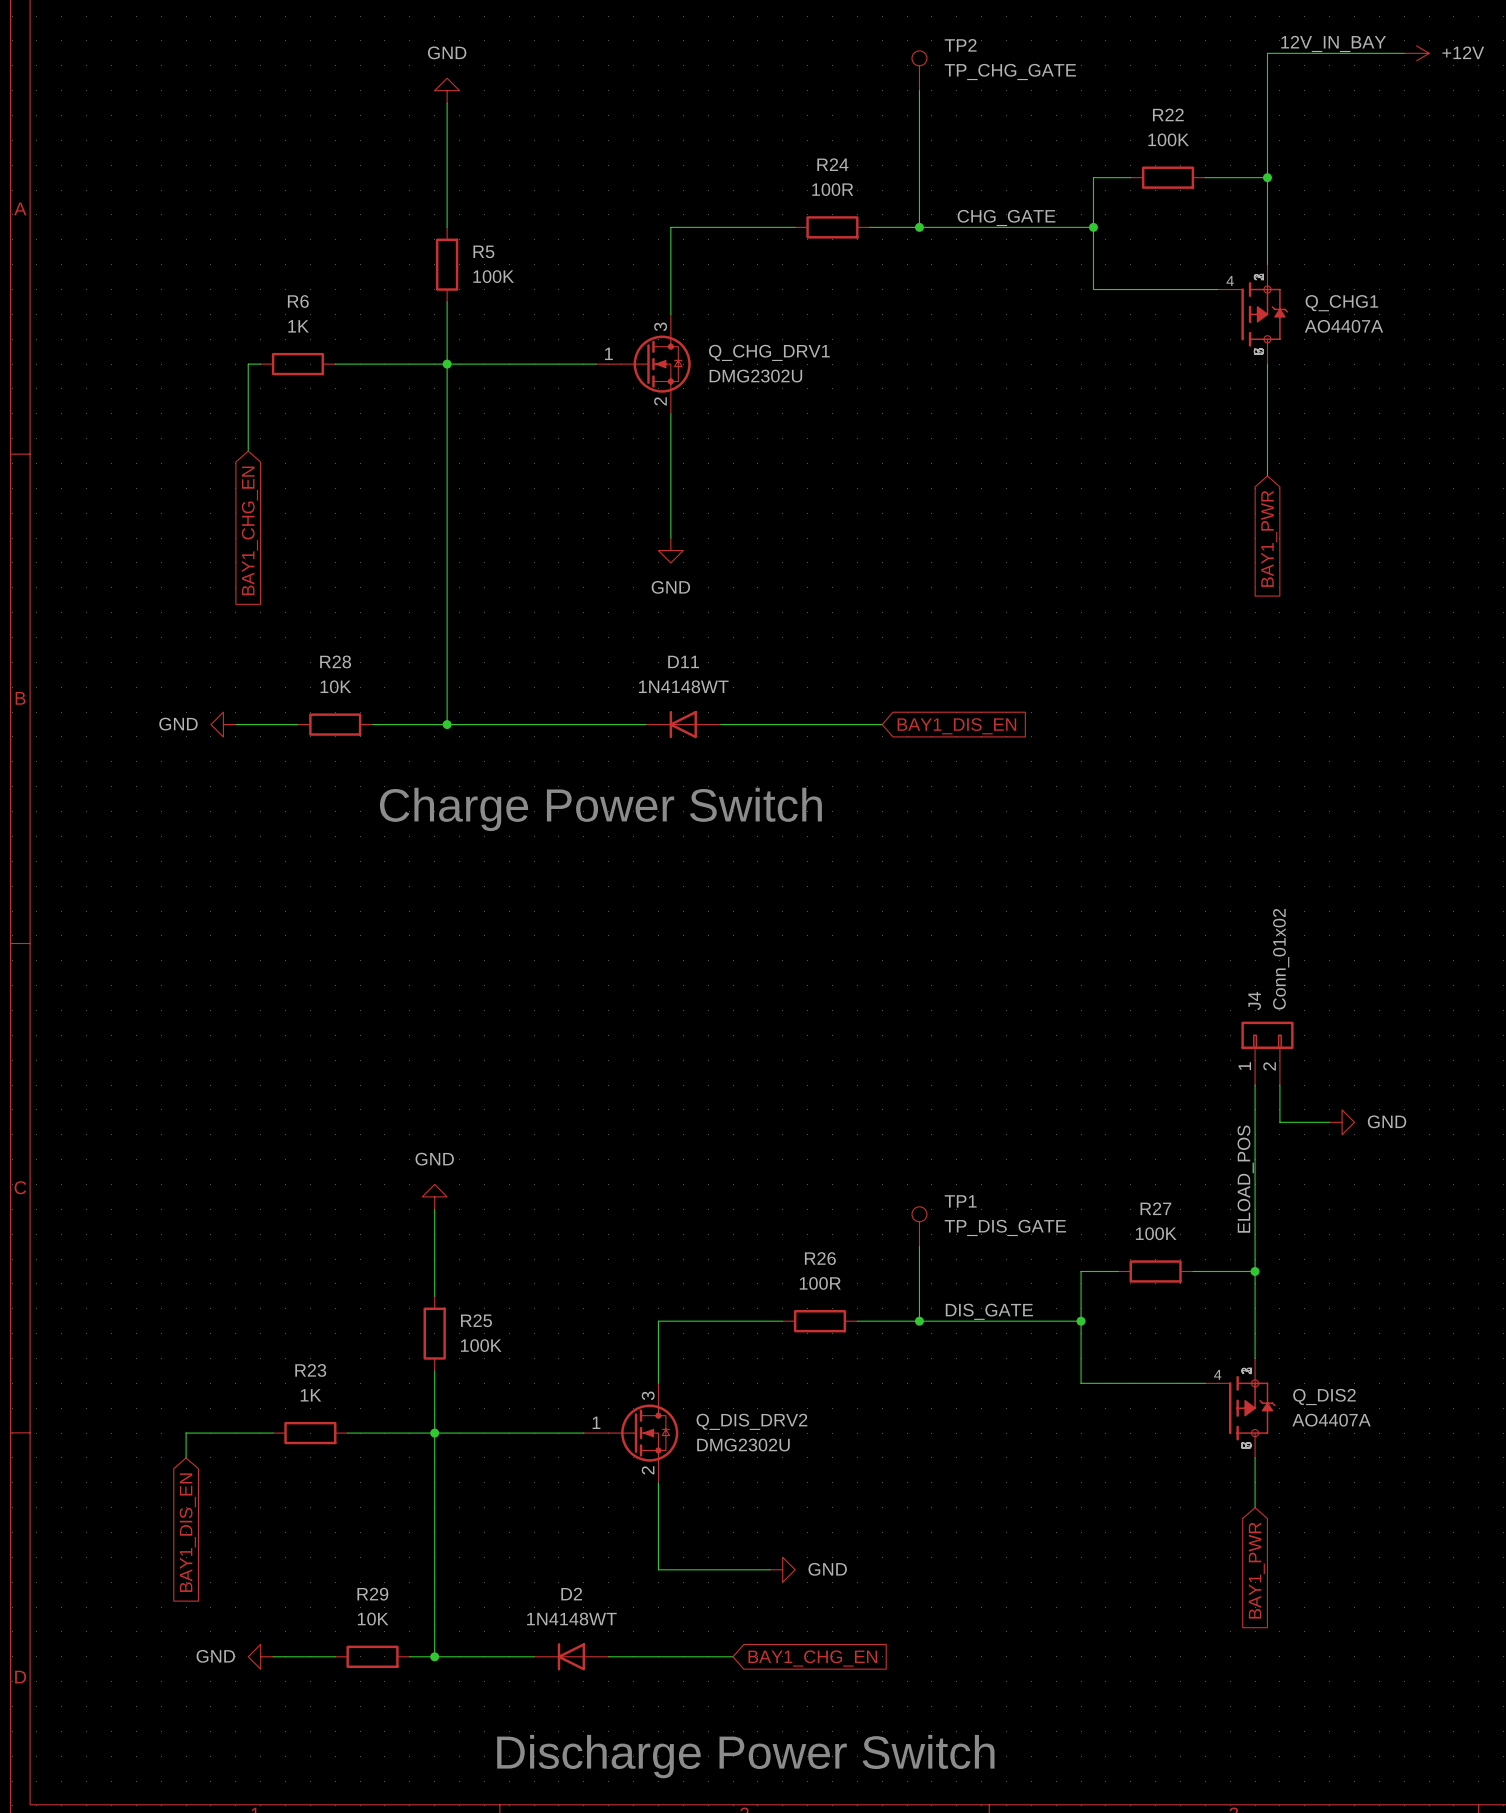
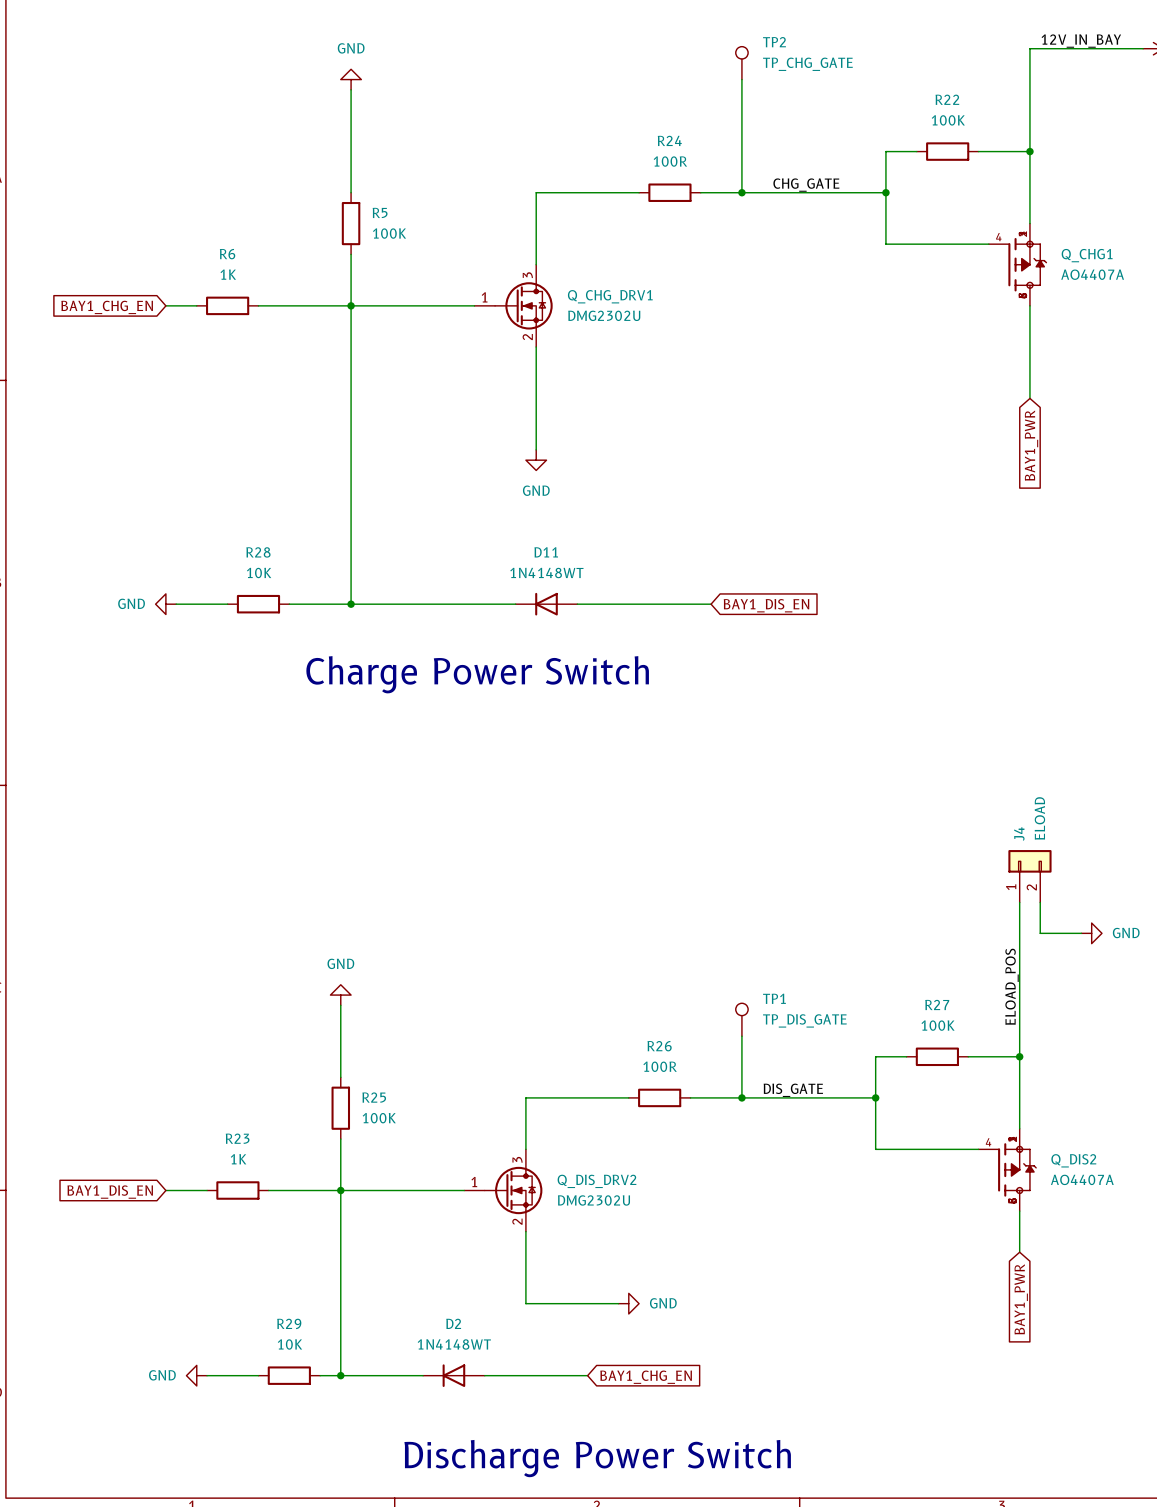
wire: (248, 364) (248, 451) -> (186, 305) (165, 305)
global label rotation: 0° (249, 530) -> 90° clockwise (107, 307)
global label position: BAY1_CHG_EN (249, 530) -> BAY1_CHG_EN (107, 307)
J4 value: Conn_01x02 (1281, 959) -> ELOAD (1039, 818)
wire: (223, 1433) (186, 1433) (186, 1457) -> none
global label rotation: 0° (187, 1532) -> 90° clockwise (110, 1192)

